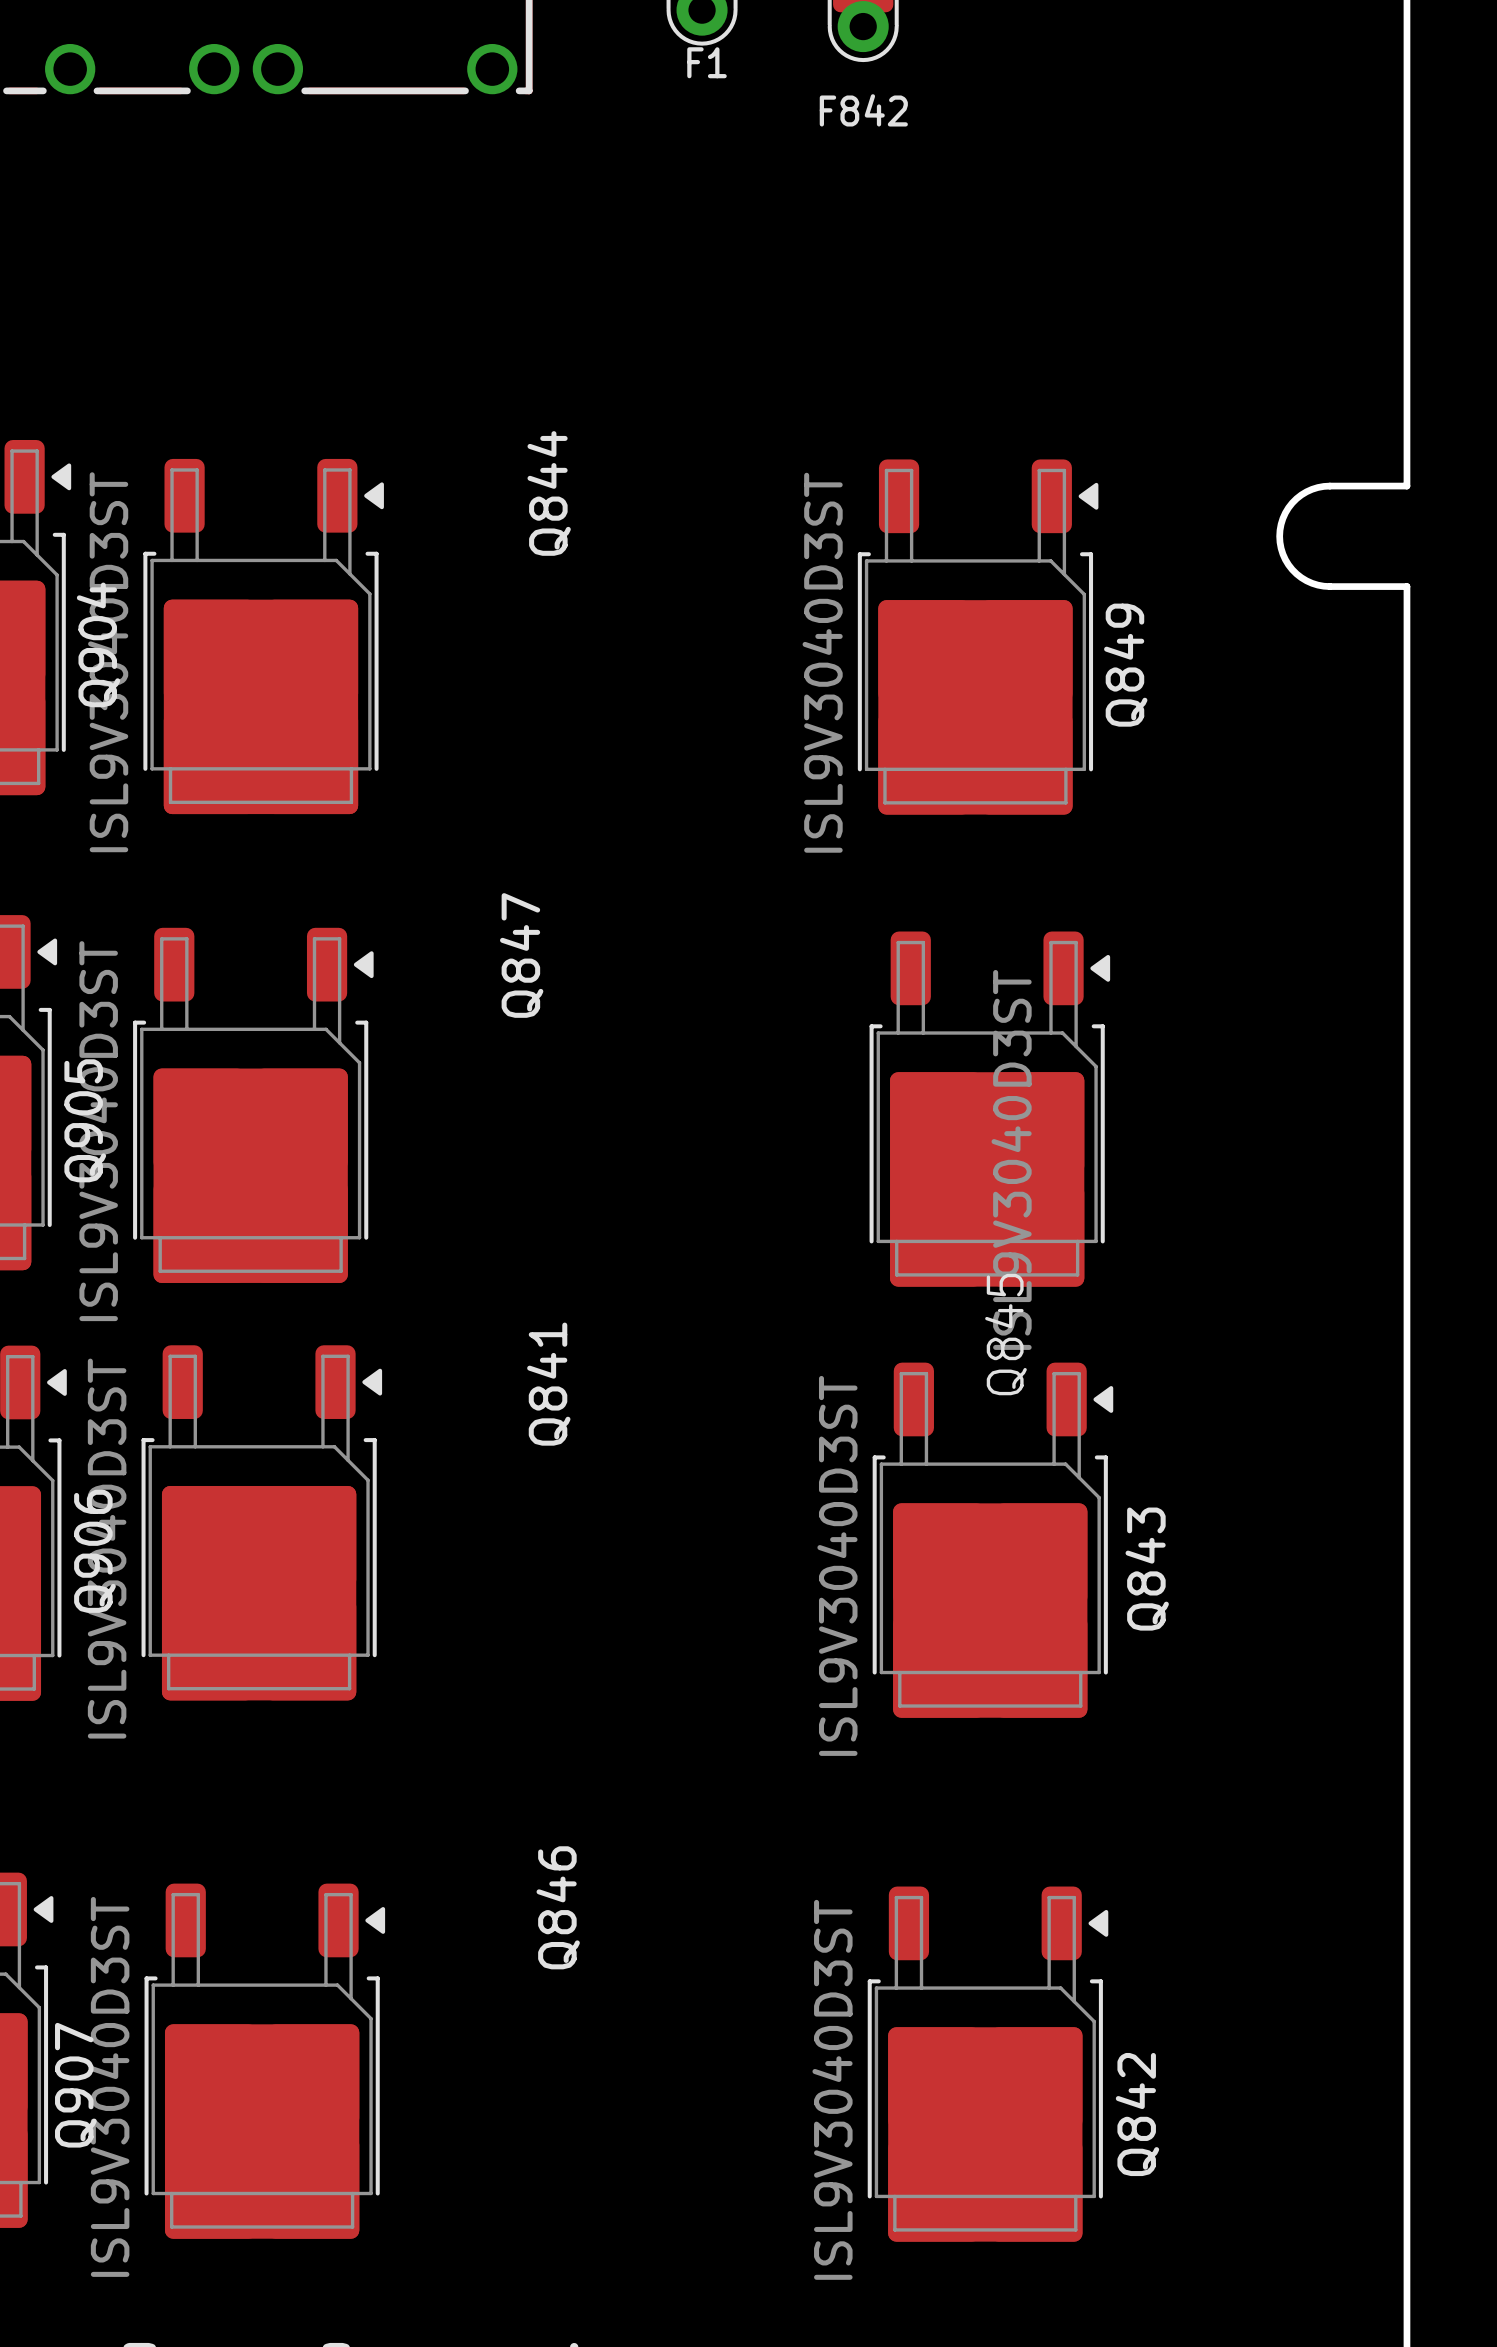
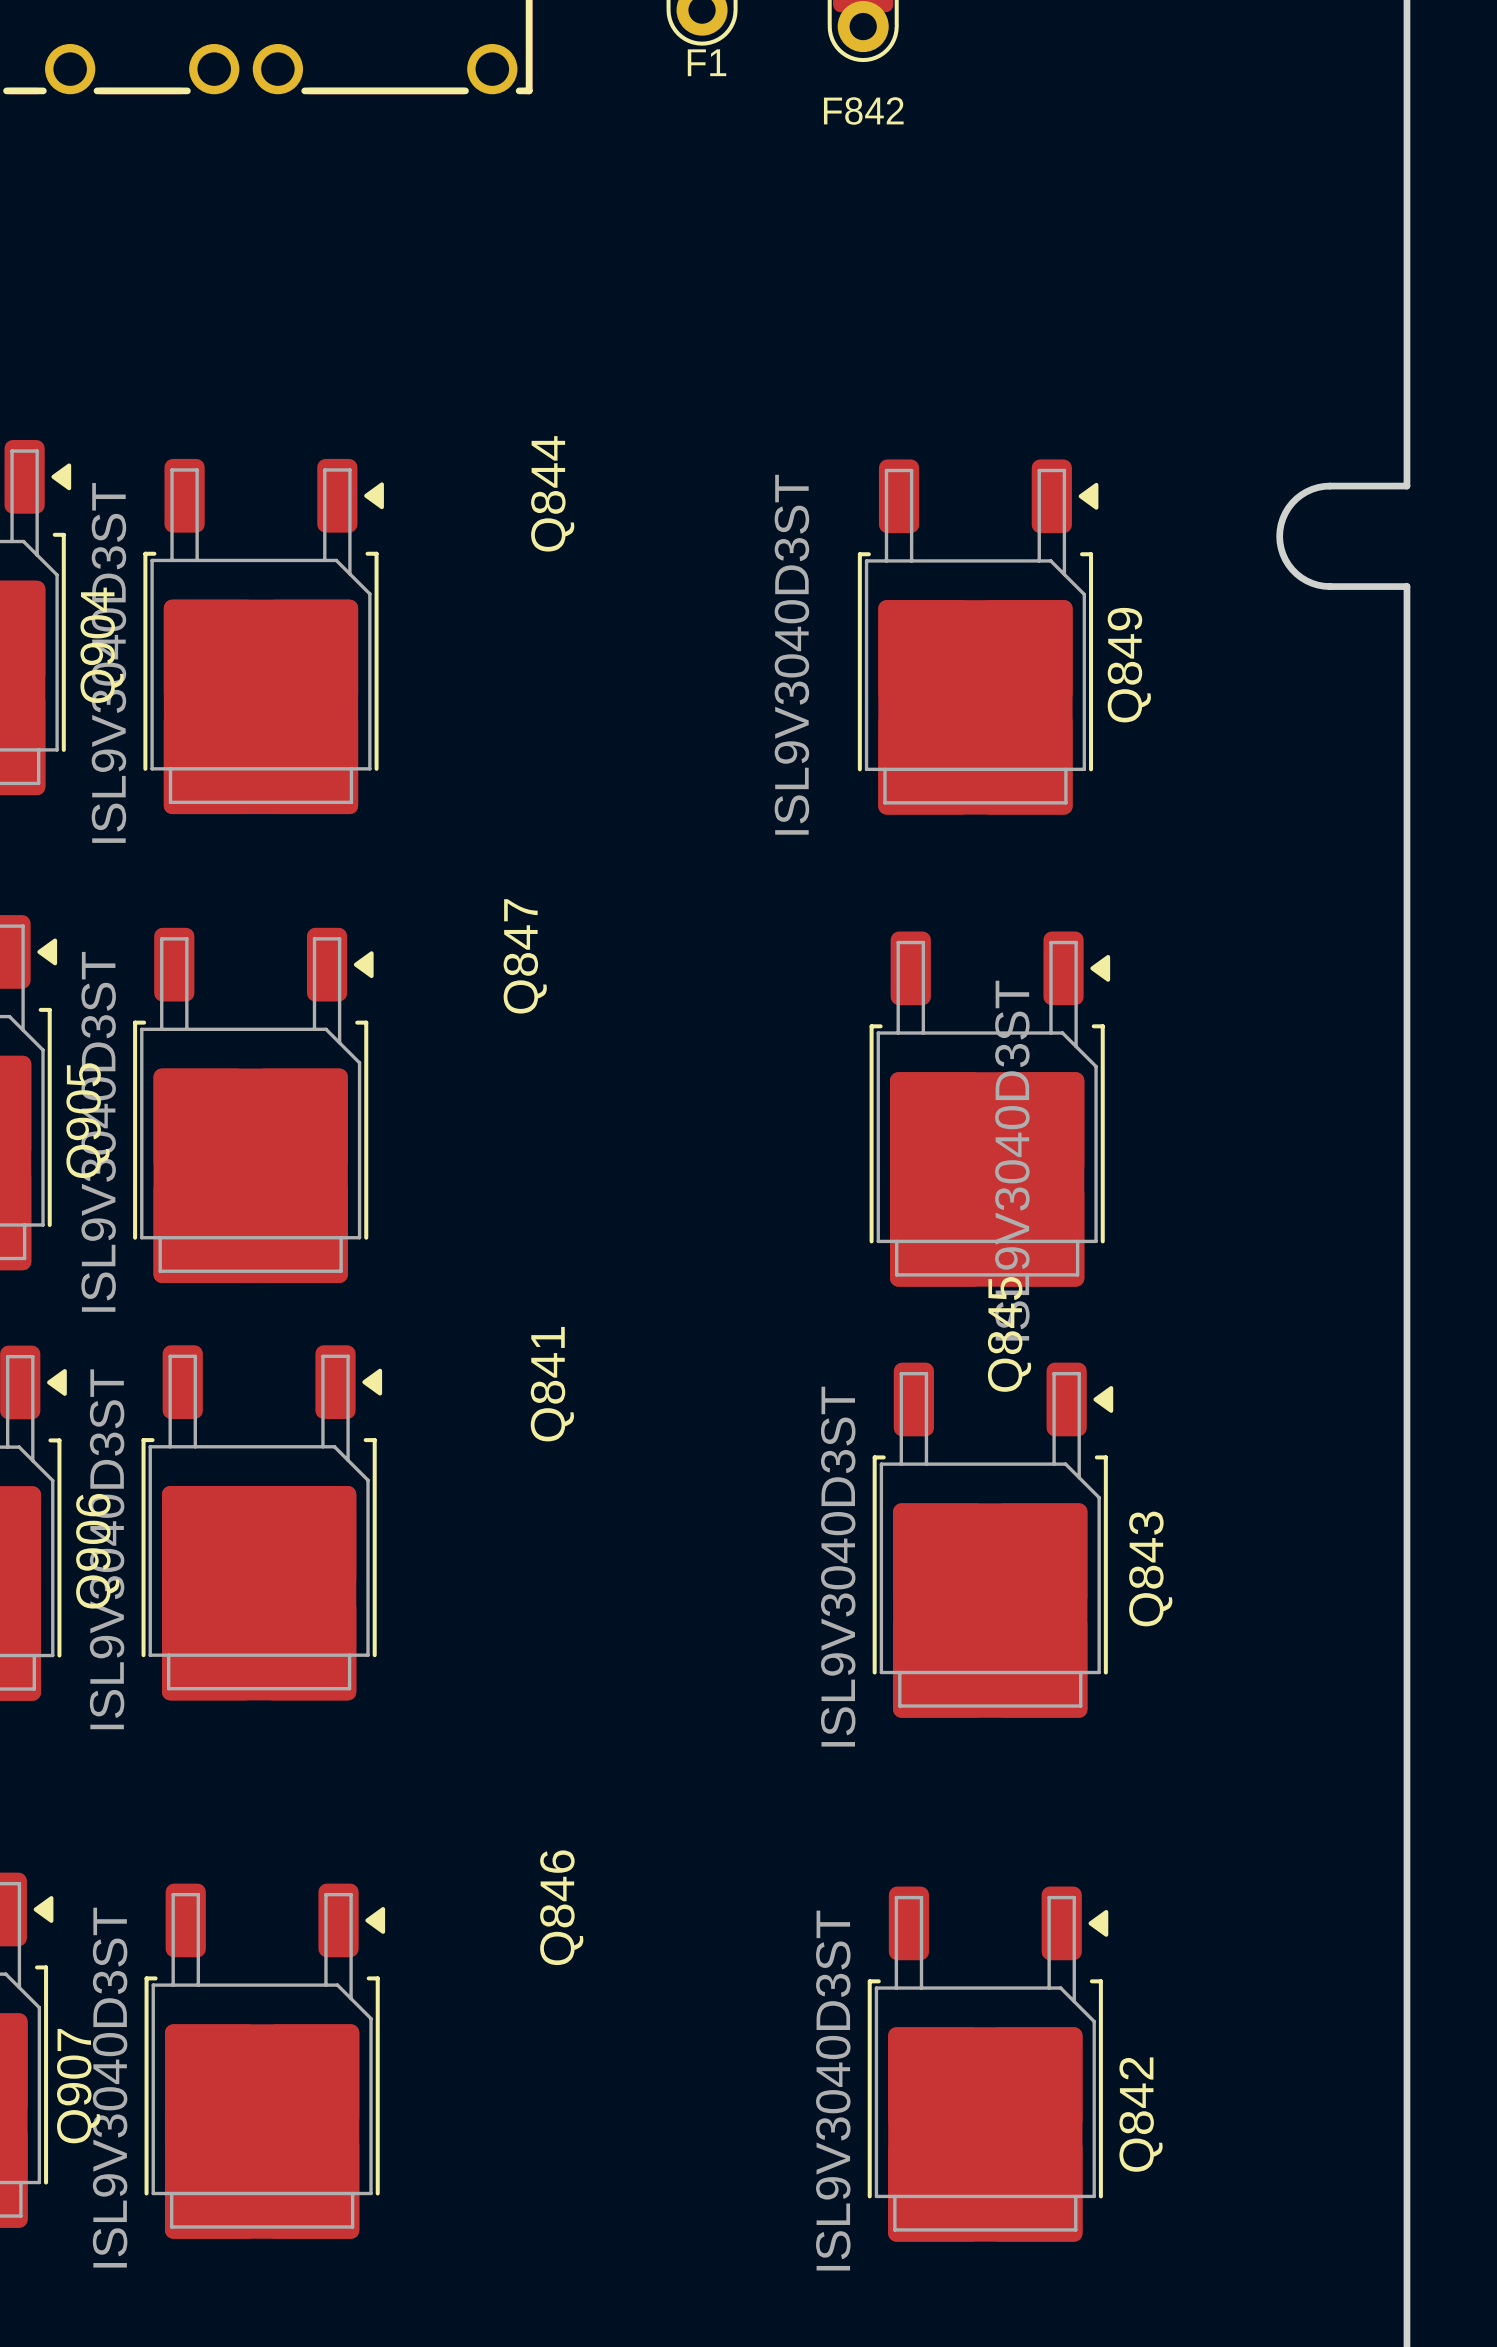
Q849 value position: ISL9V3040D3ST (822, 662) -> ISL9V3040D3ST (791, 654)

